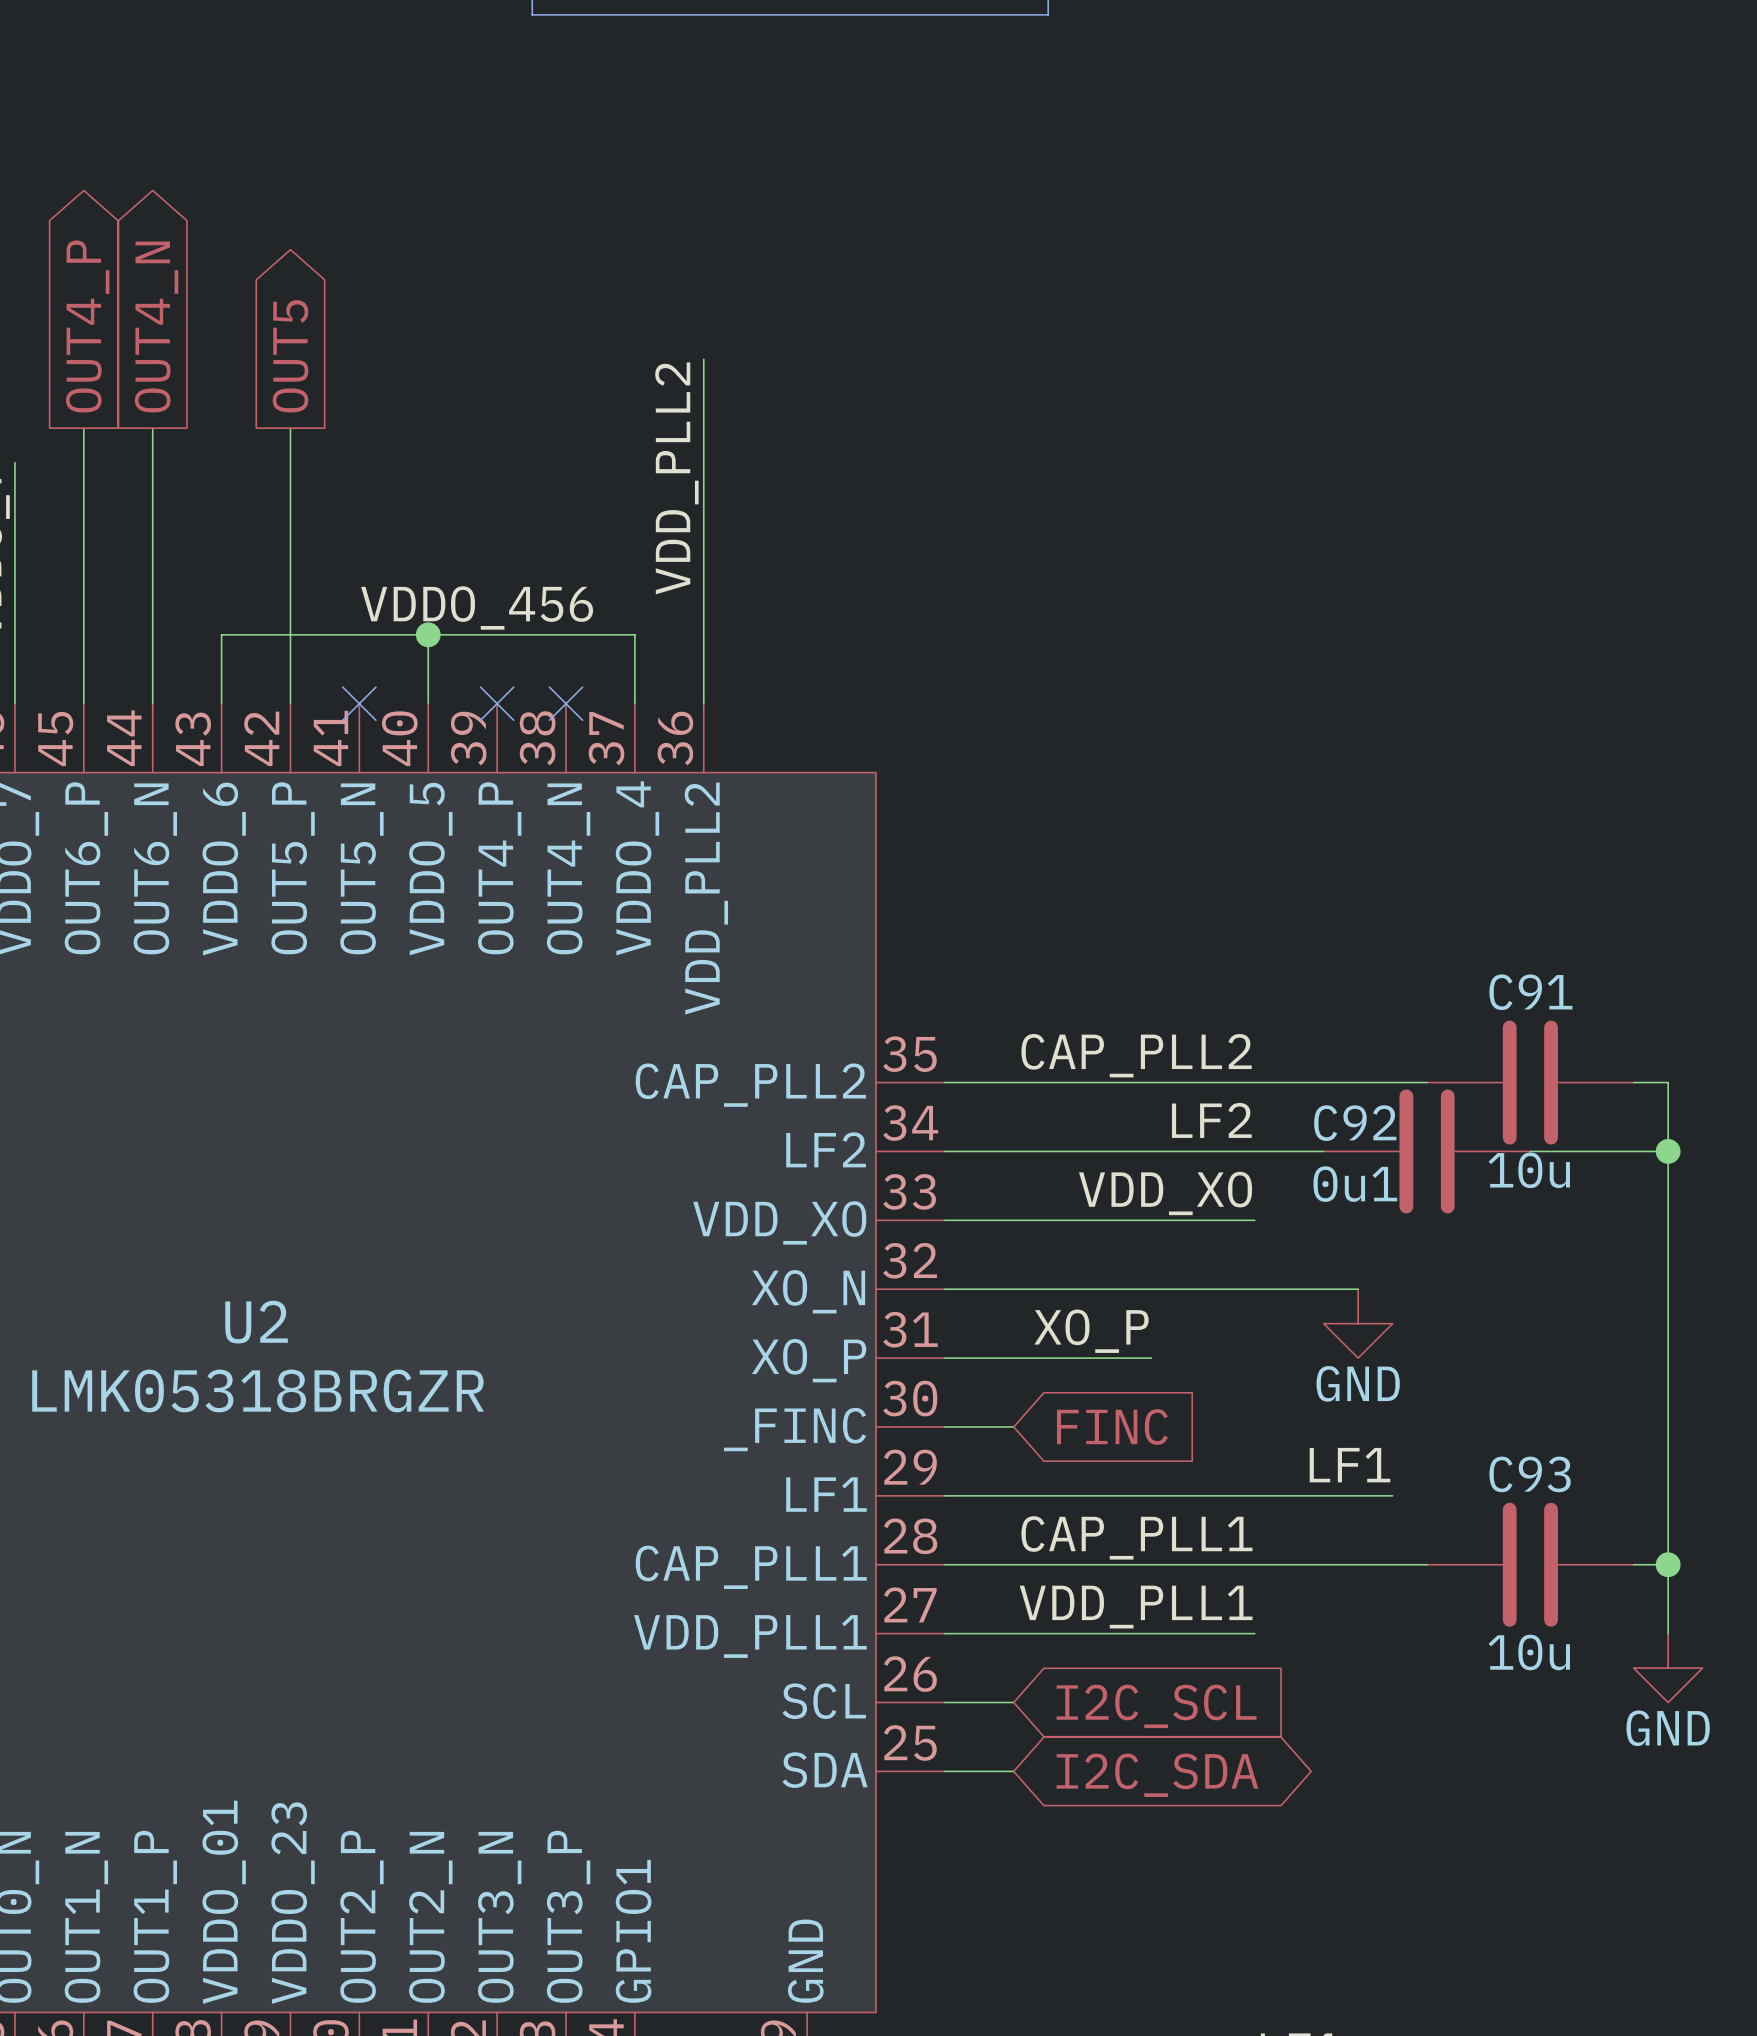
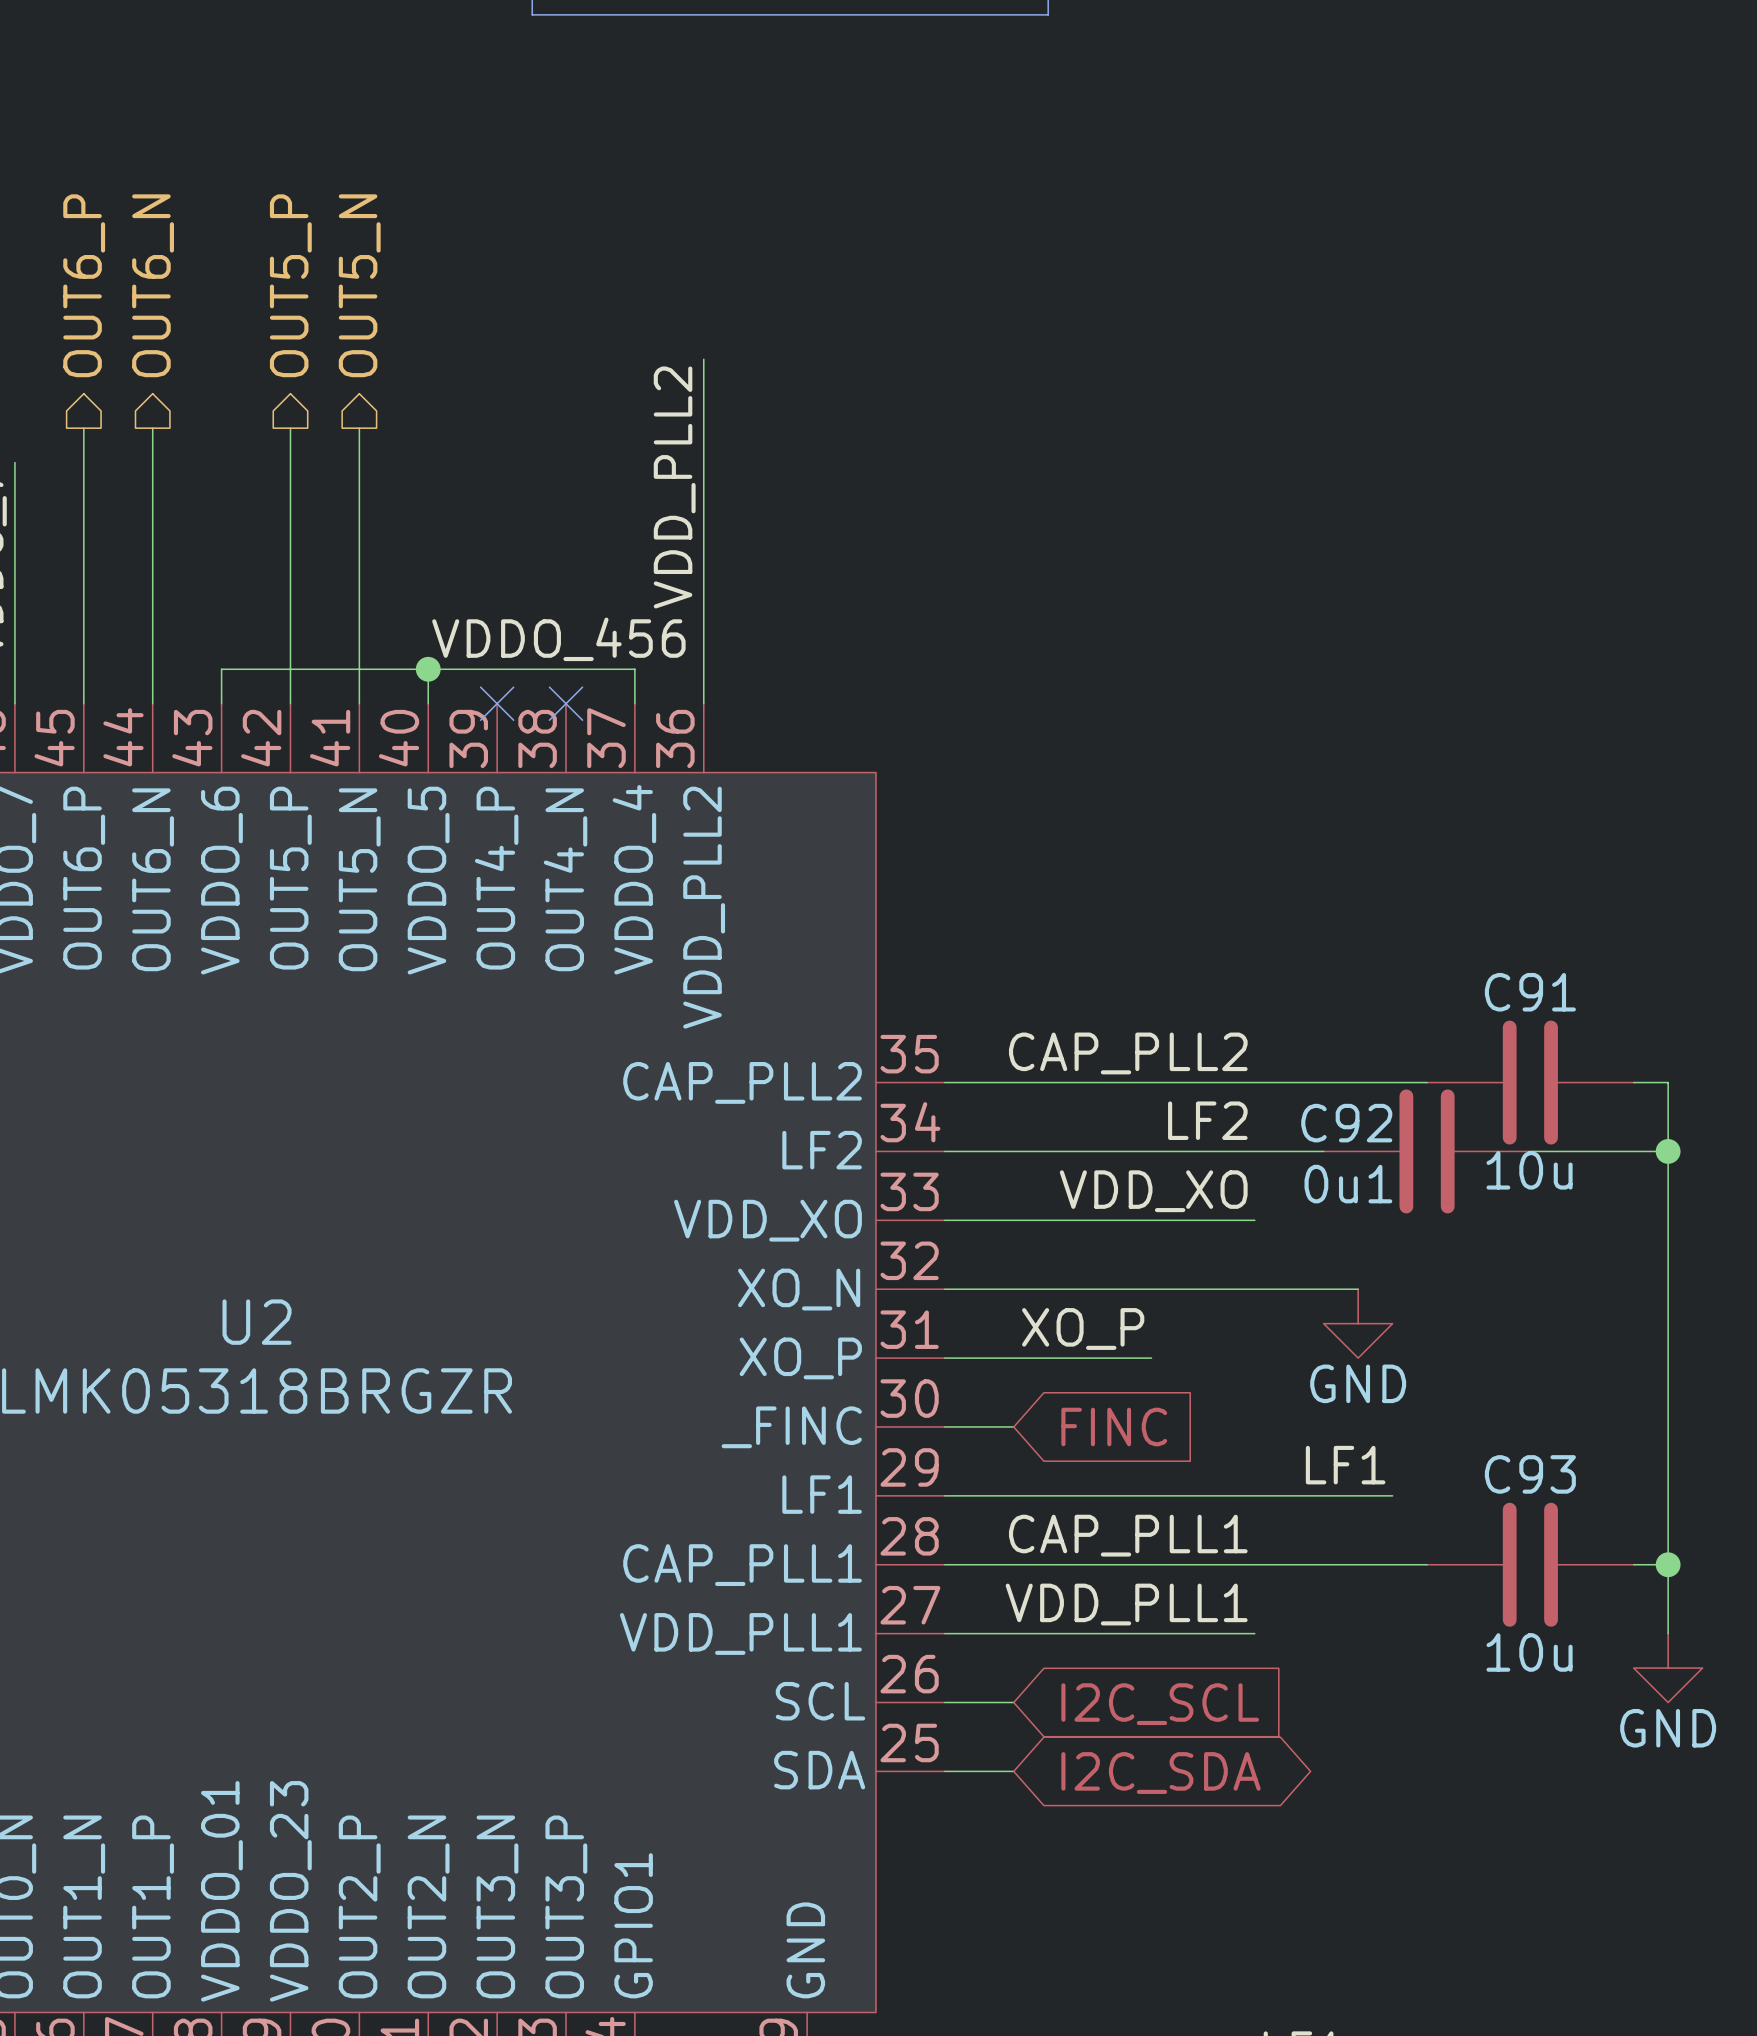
hierarchical label: none -> OUT6_P (84, 285)
hierarchical label: none -> OUT5_P (290, 285)
hierarchical label: none -> OUT6_N (153, 285)
hierarchical label: none -> OUT5_N (359, 285)
global label: OUT4_P (87, 326) -> none
global label: OUT4_N (156, 327) -> none
global label: OUT5 (290, 356) -> none
wire: none -> (359, 428) (359, 703)
label position: VDDO_456 (477, 607) -> VDDO_456 (558, 639)
wire: (428, 634) (428, 669) -> none
junction position: (428, 634) -> (428, 669)
wire: (221, 669) (221, 634) (634, 634) (634, 669) -> (221, 669) (634, 669)
no-connect mark: (359, 703) -> none

